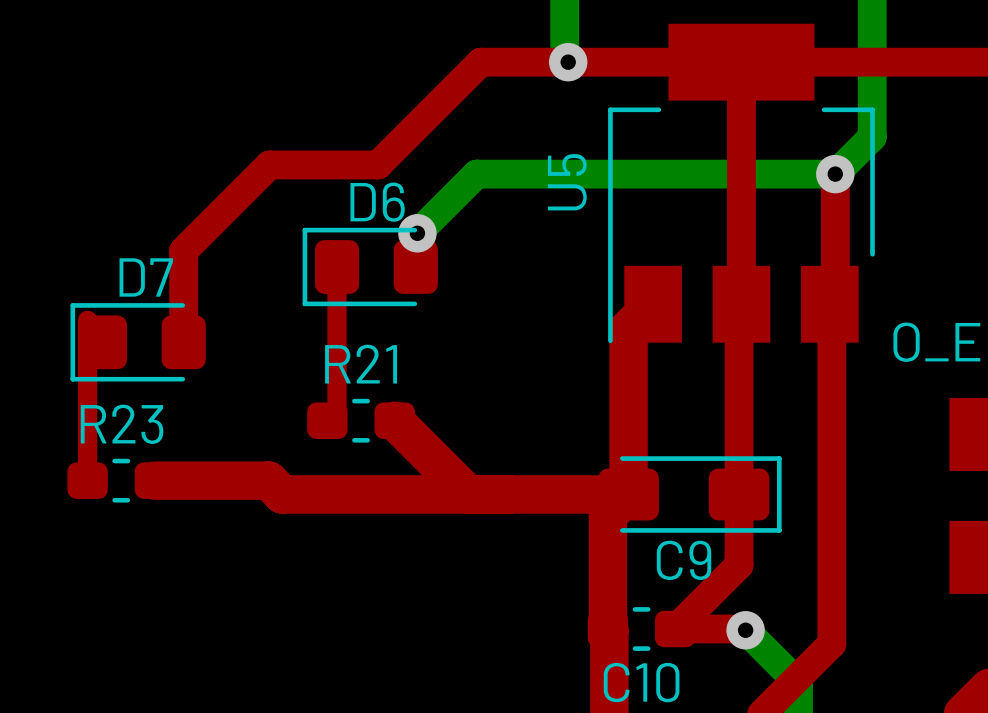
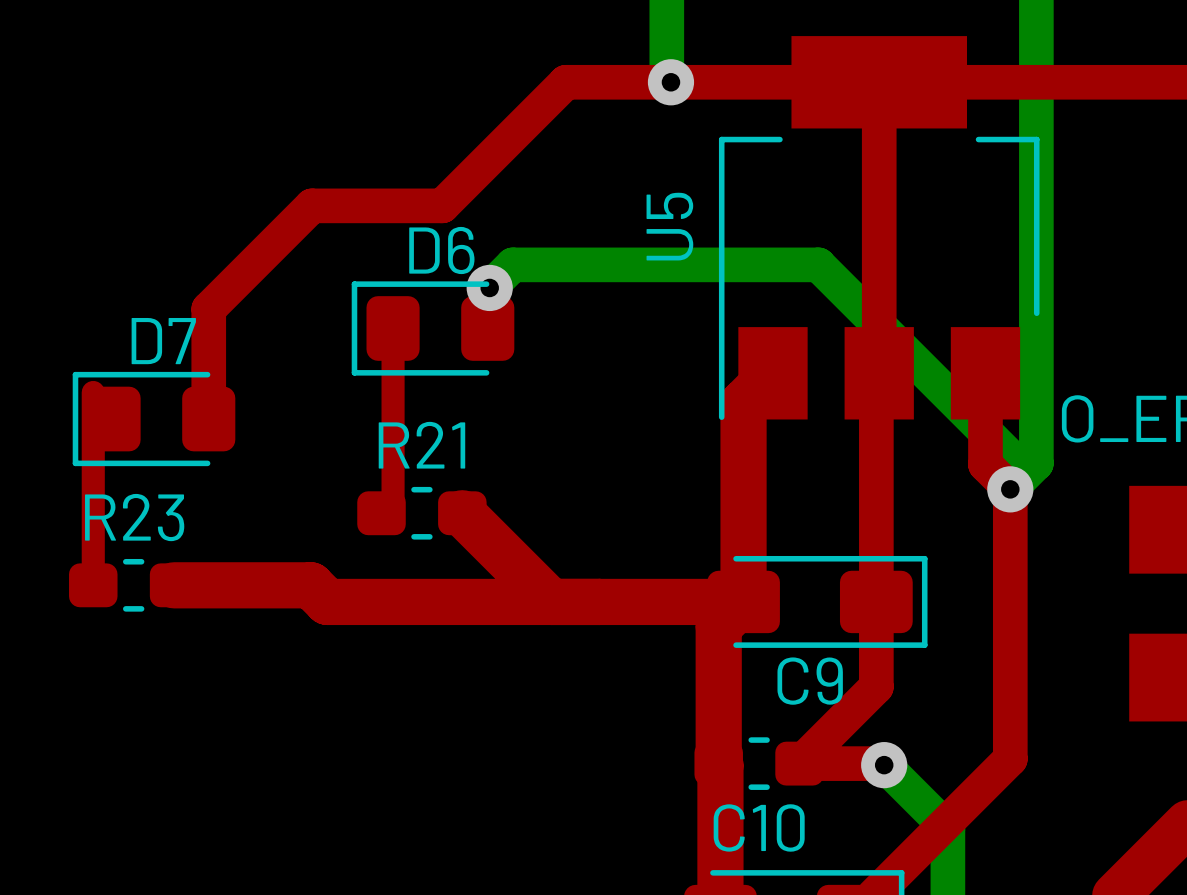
bottom track: (872, 137) (835, 174) (476, 174) (436, 214) -> (1036, 172) (1036, 463) (1010, 489) (1010, 456) (818, 264) (512, 264)
top track: (835, 174) (835, 288) (831, 291) (831, 643) -> (985, 373) (985, 464) (1010, 489) (1010, 758) (987, 781)
via position: (835, 174) -> (1010, 489)

